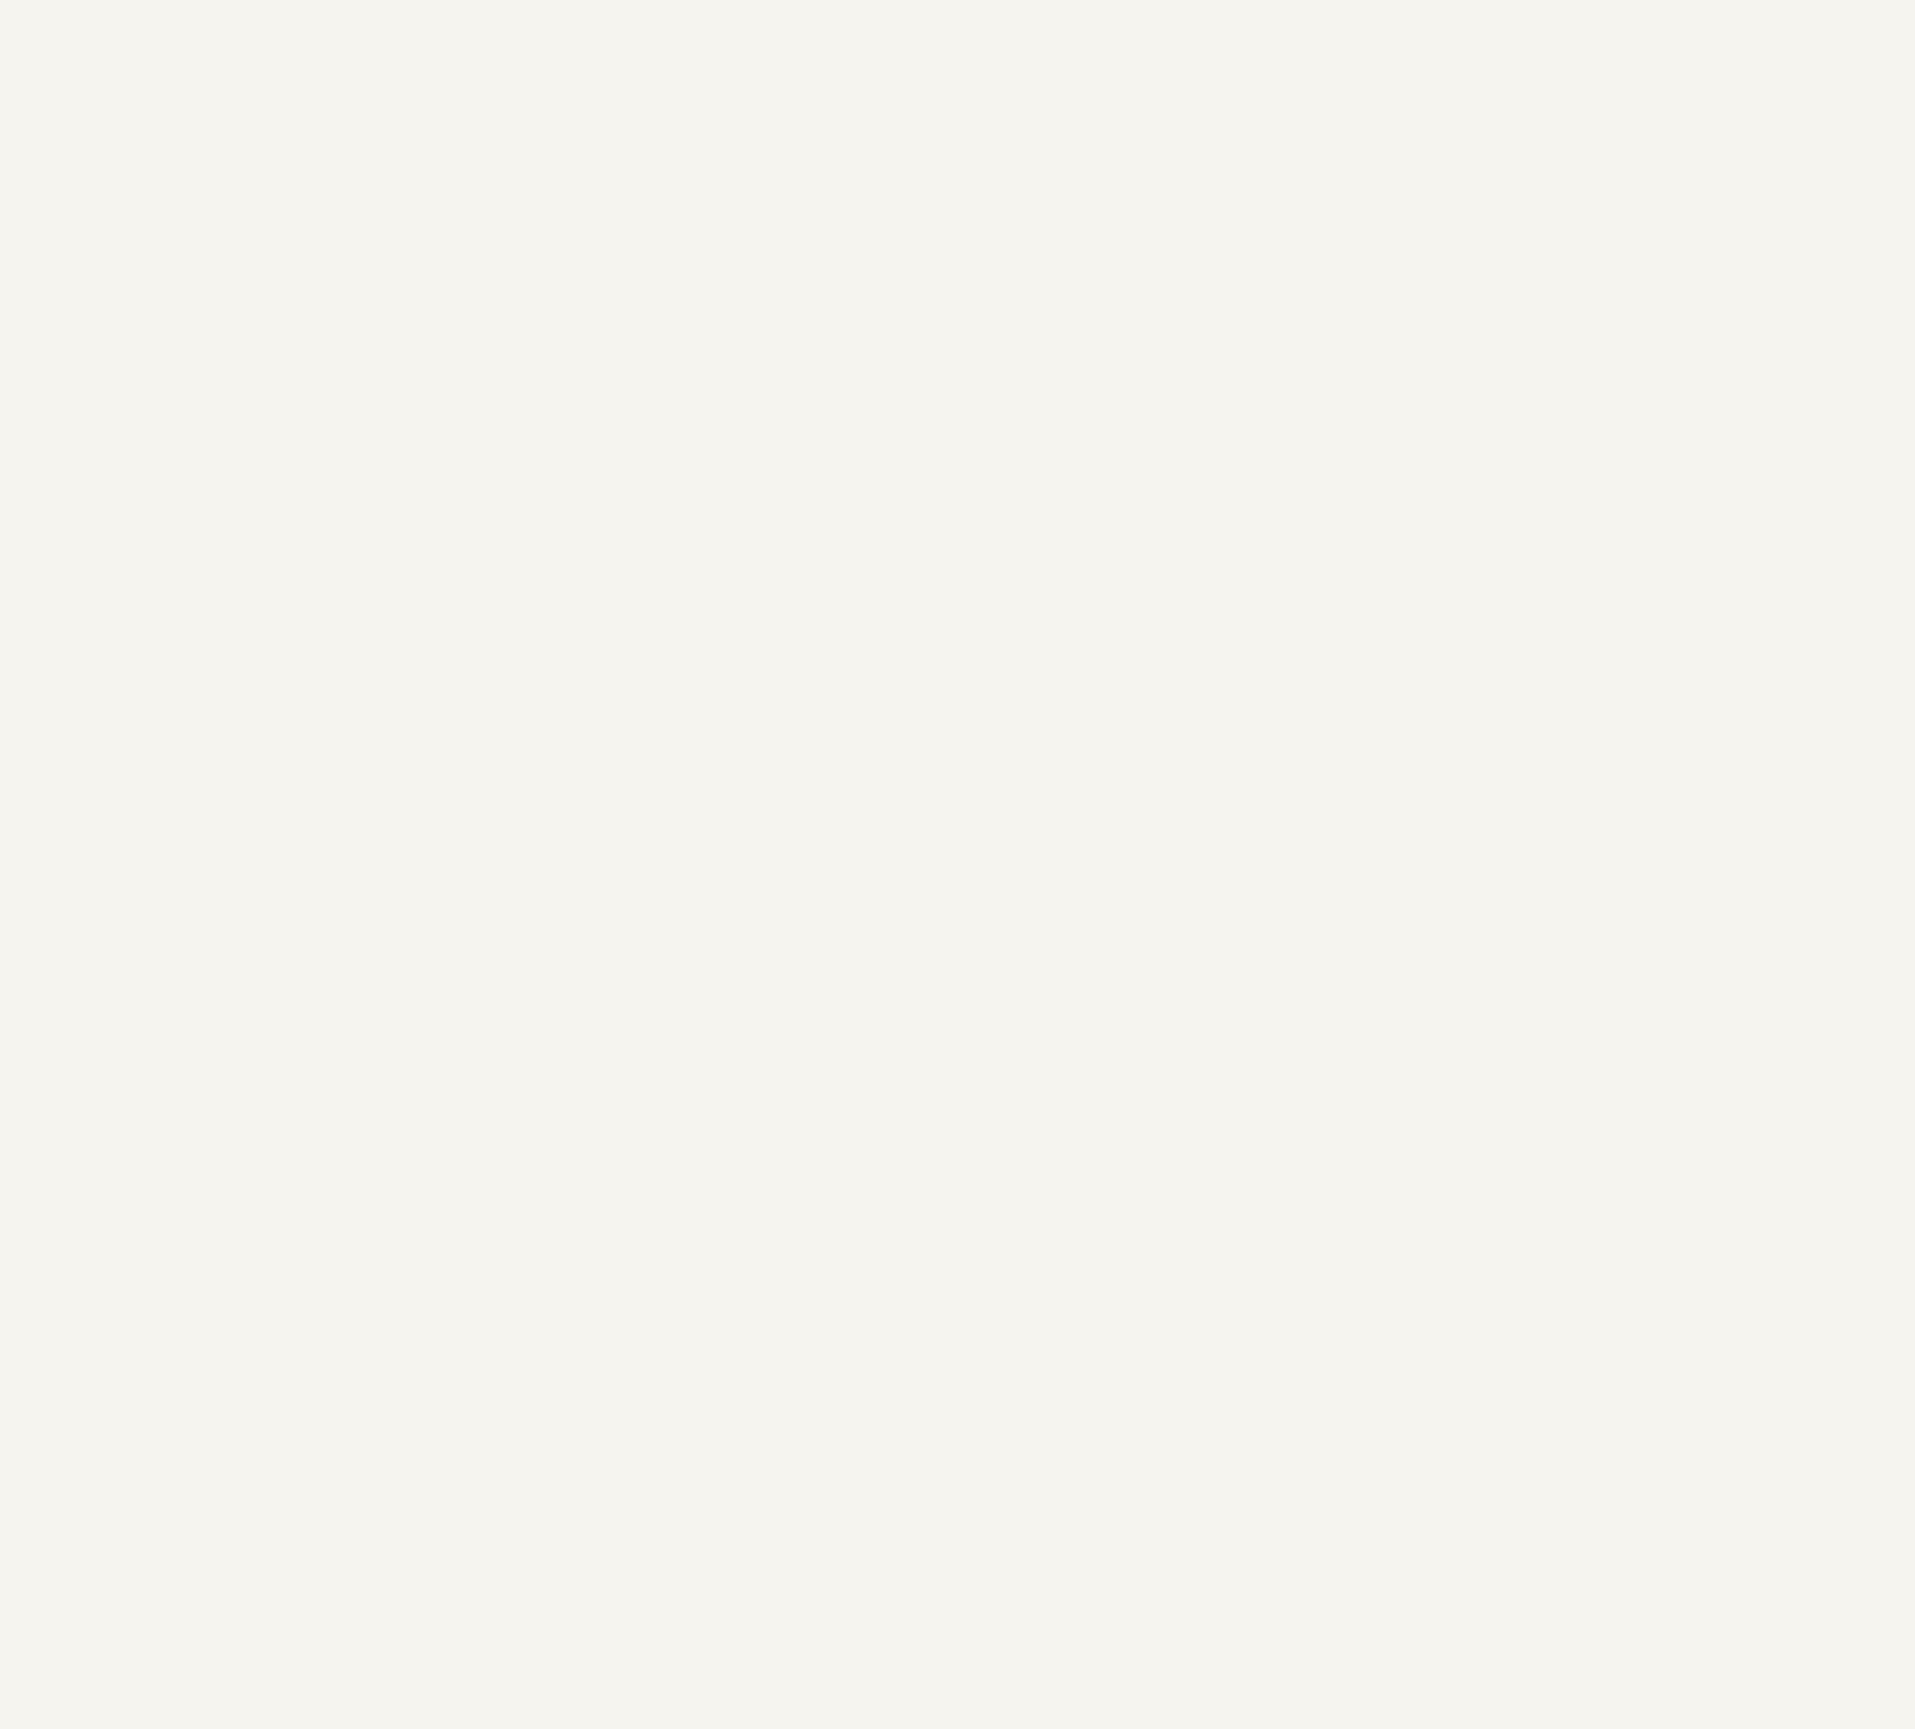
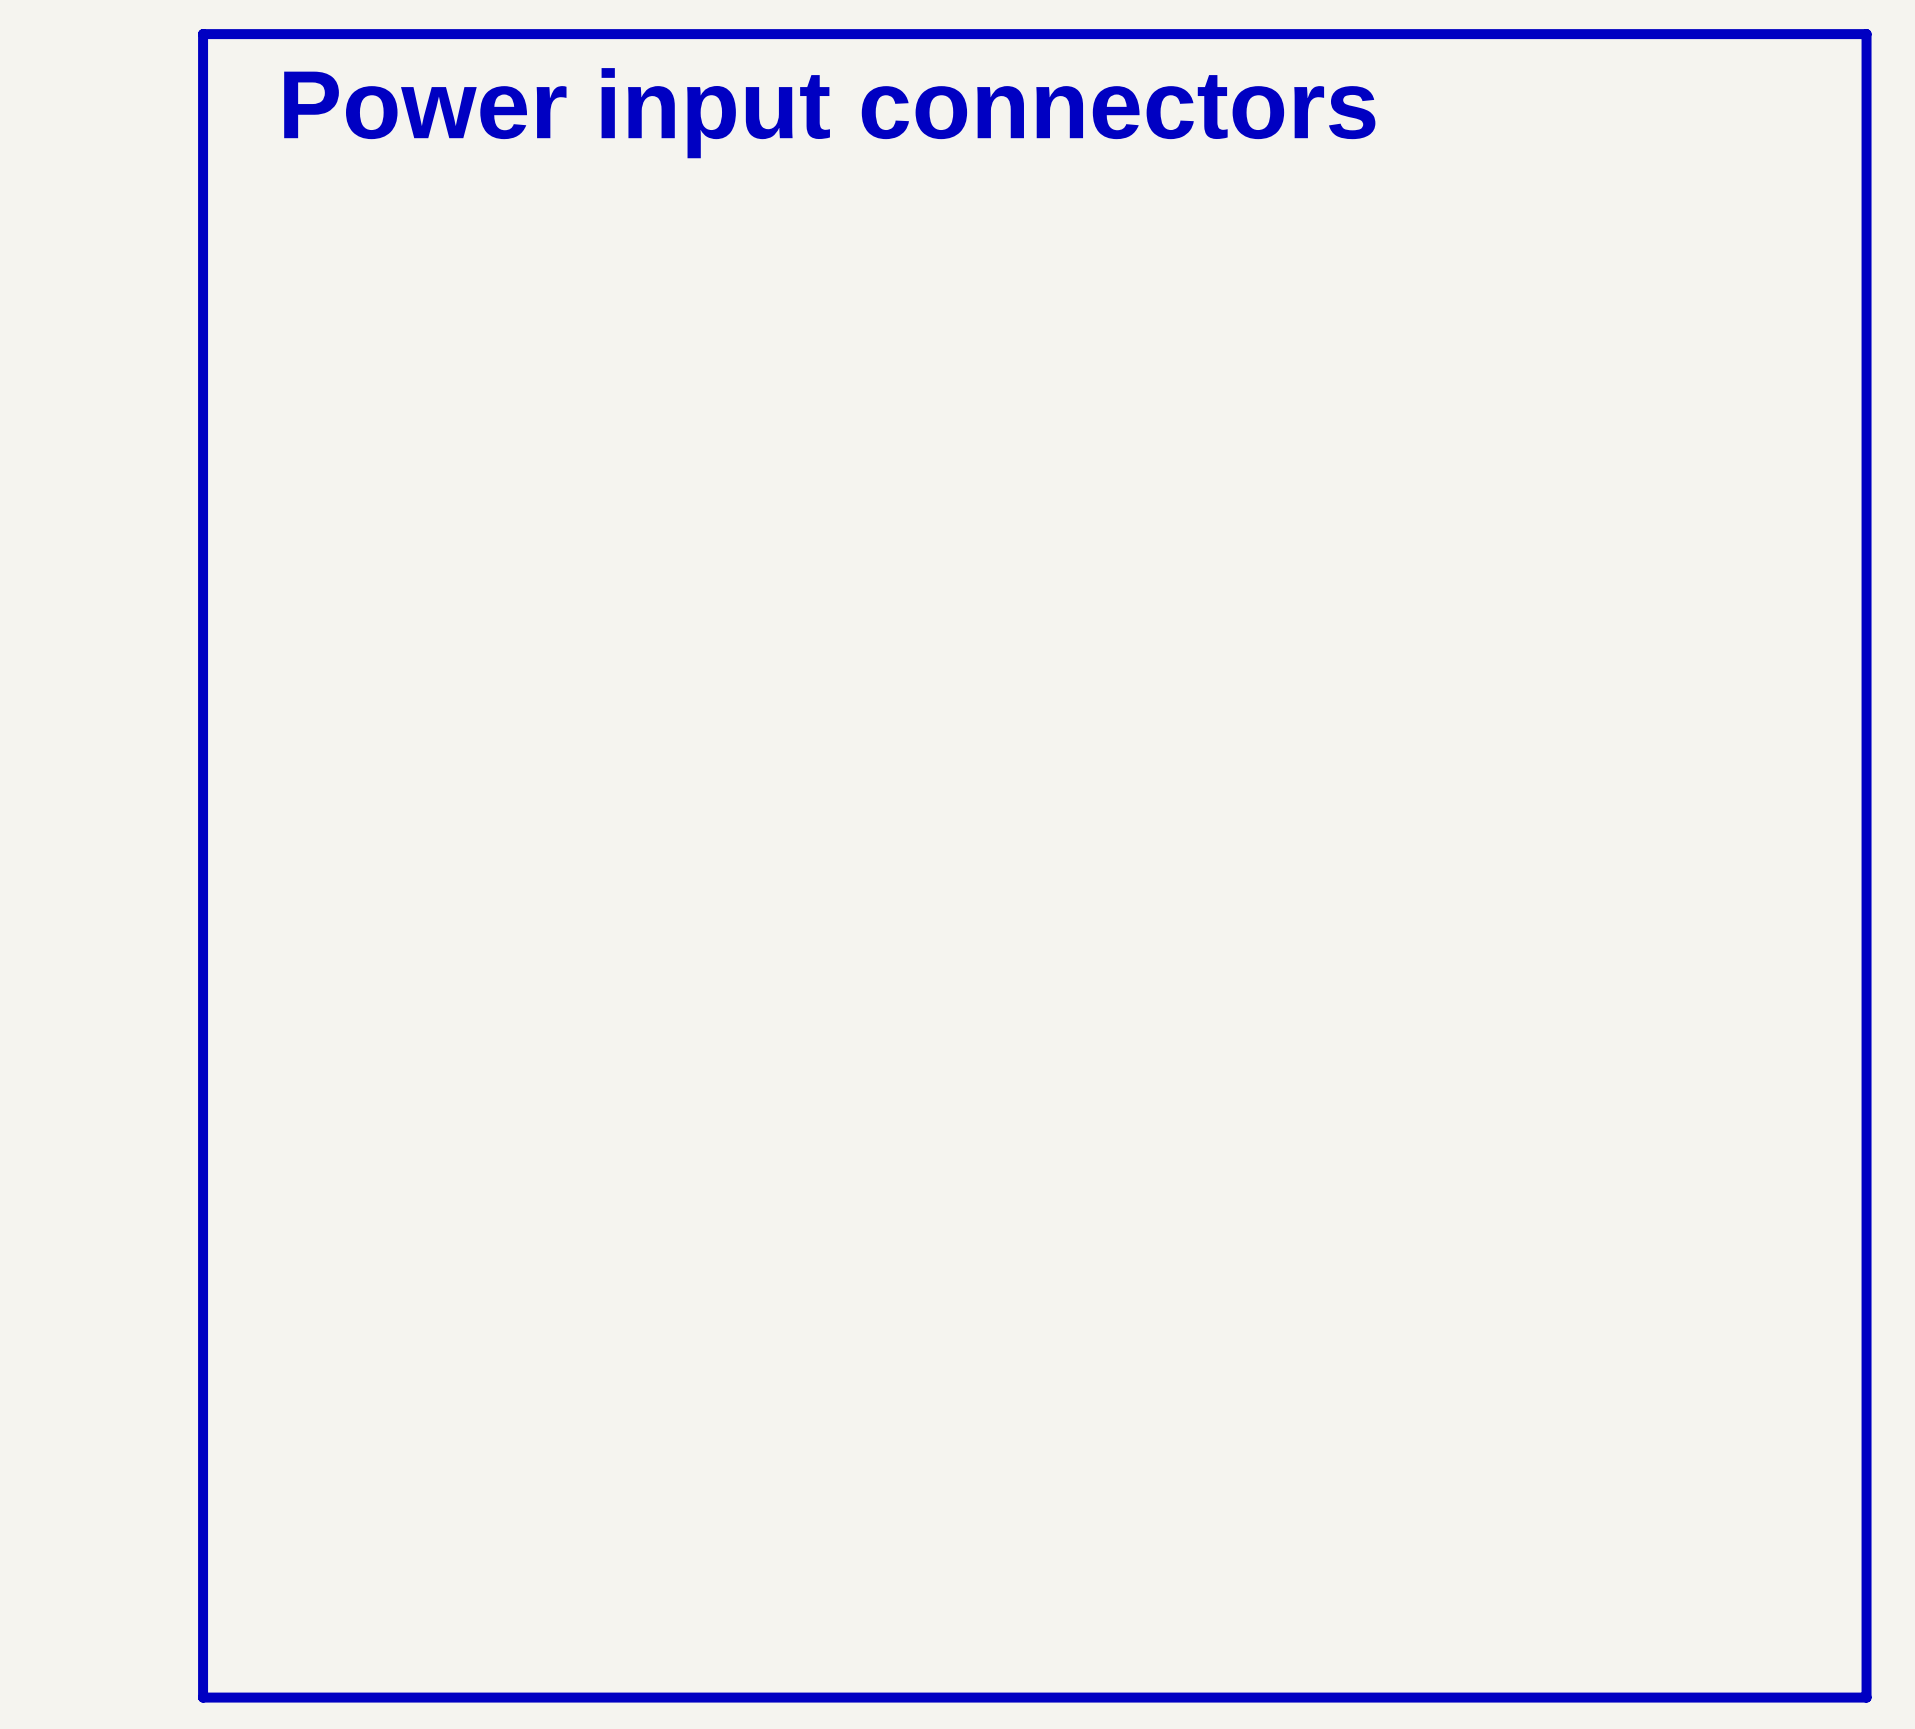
line: none -> (203, 34) (1866, 34) (1866, 1697) (203, 1697) (203, 34)
text: none -> Power input connectors (829, 113)

